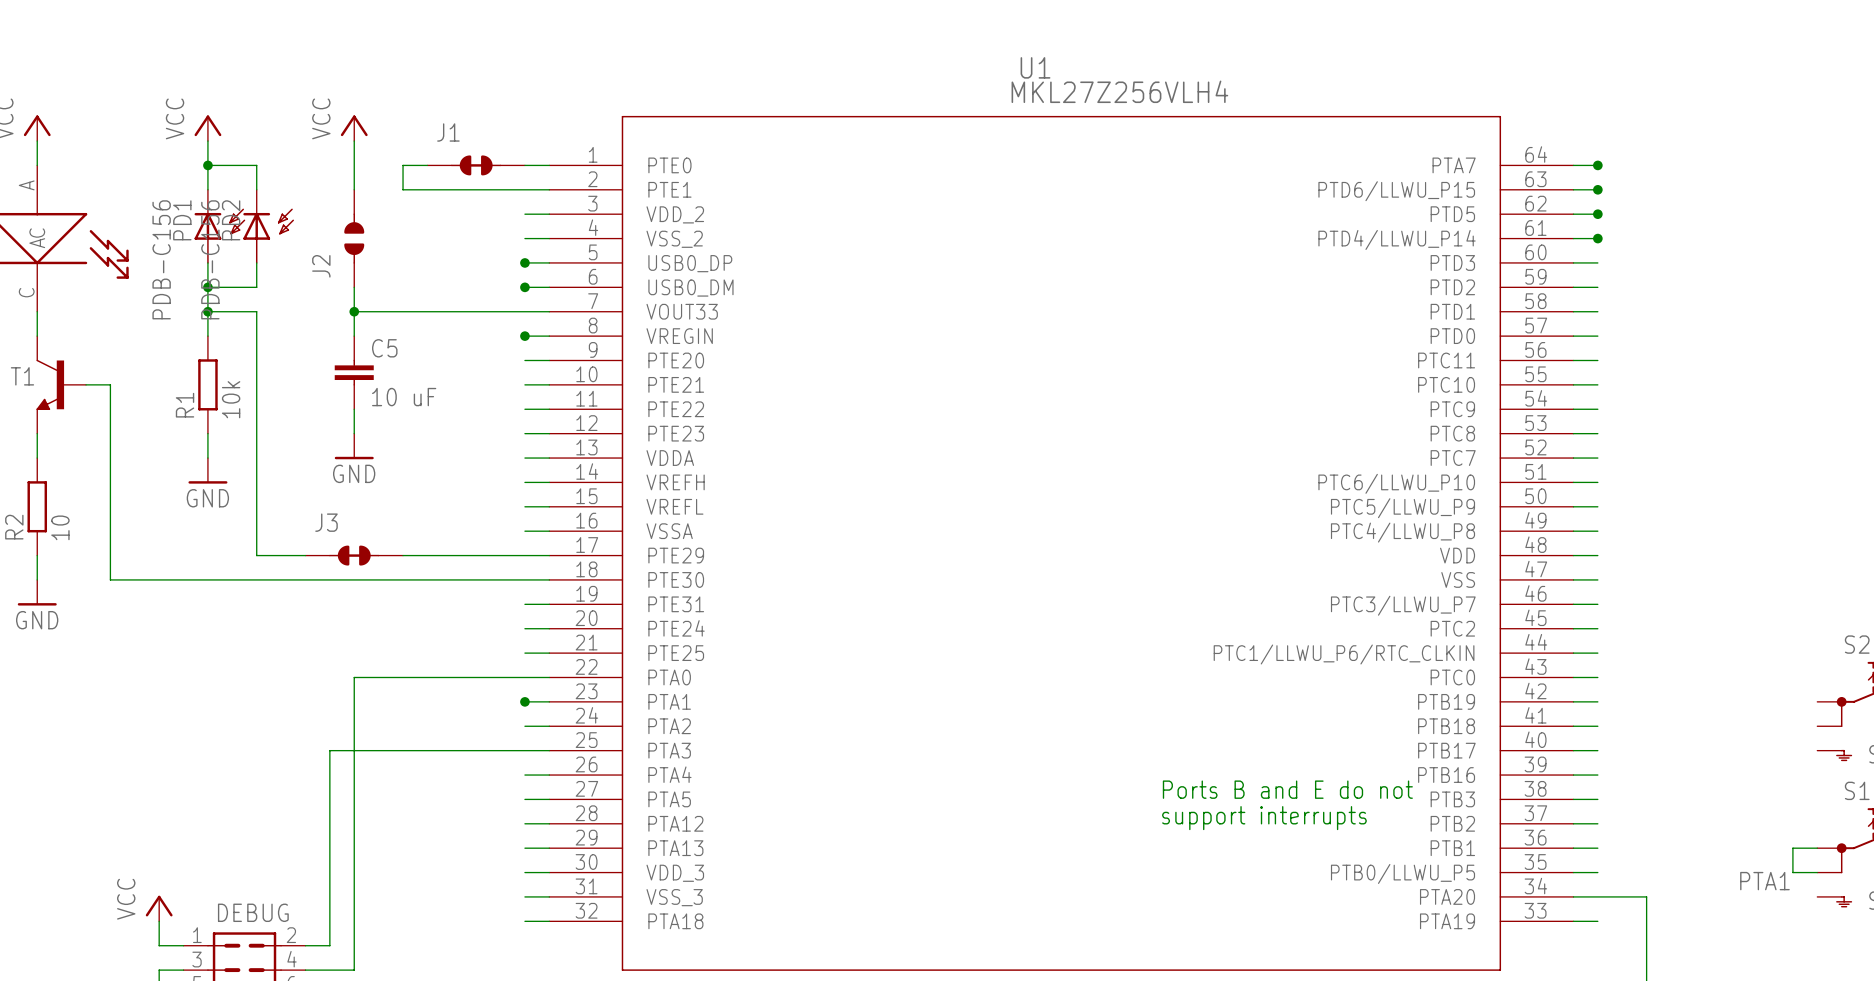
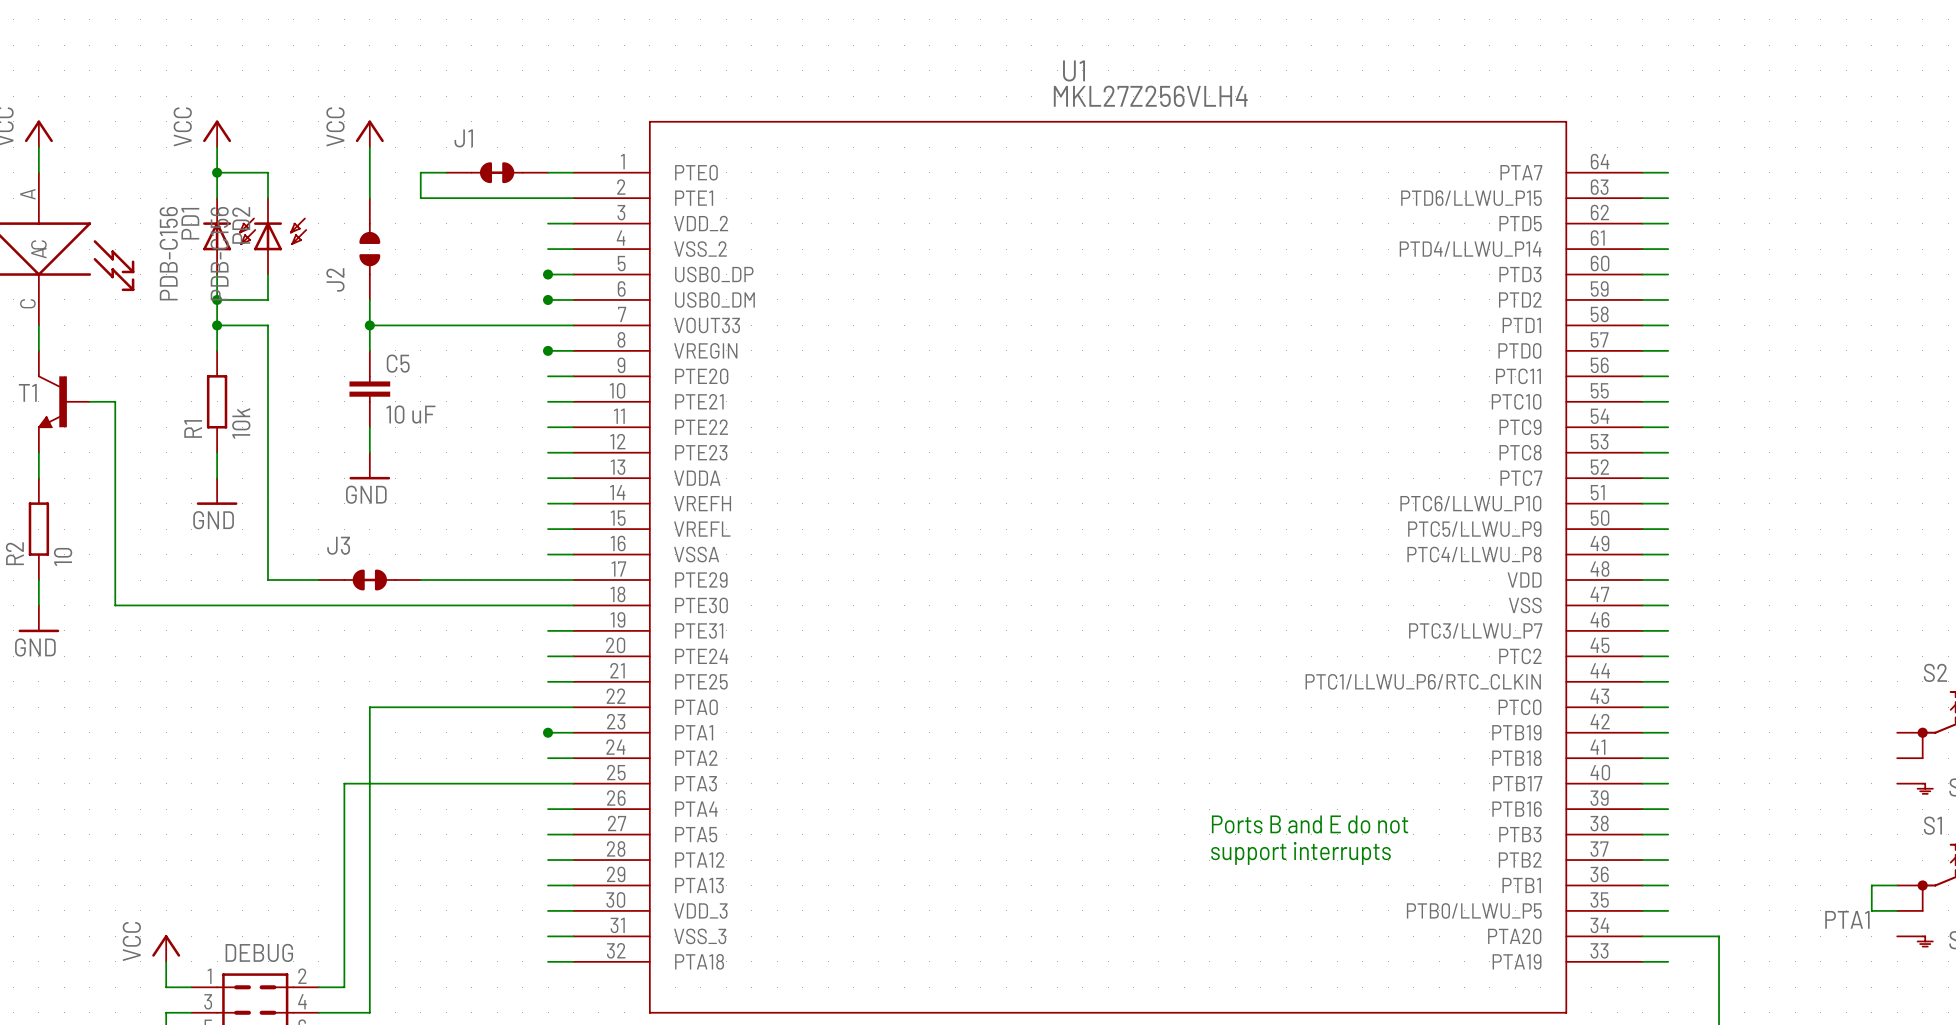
junction: (1597, 165) -> none
junction: (1597, 189) -> none
junction: (1597, 214) -> none
junction: (1597, 238) -> none

